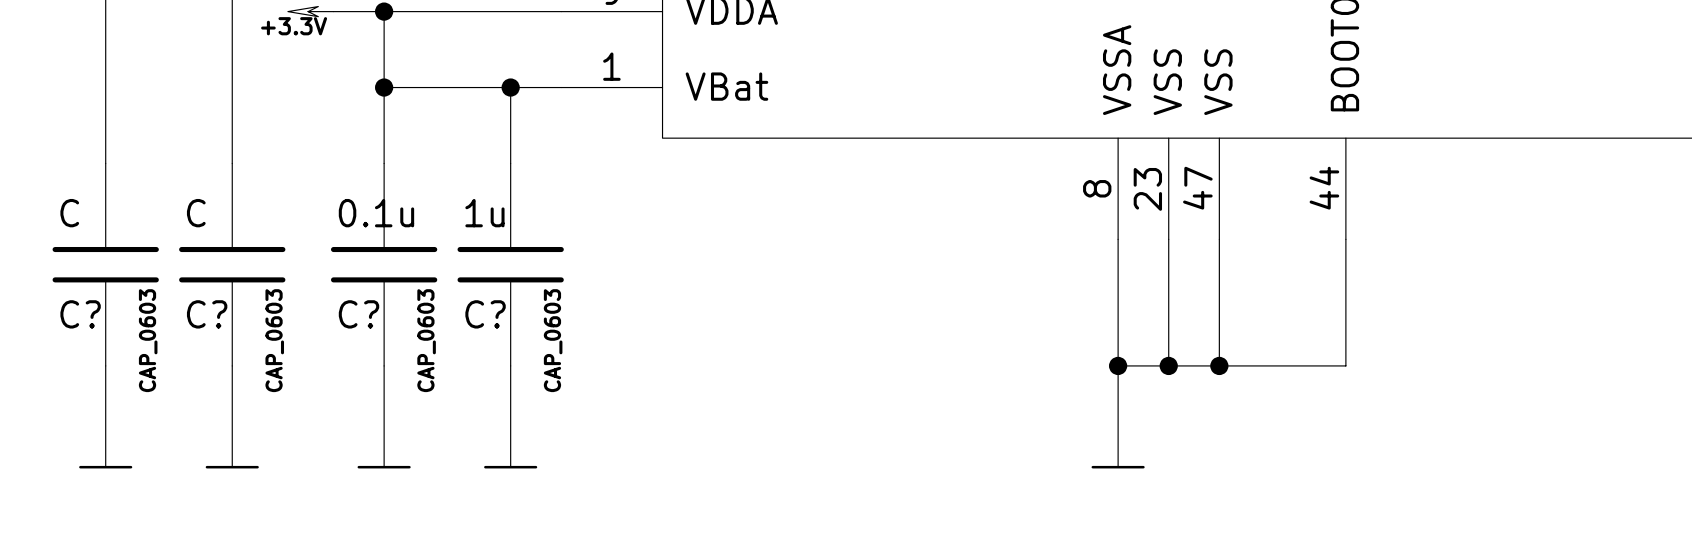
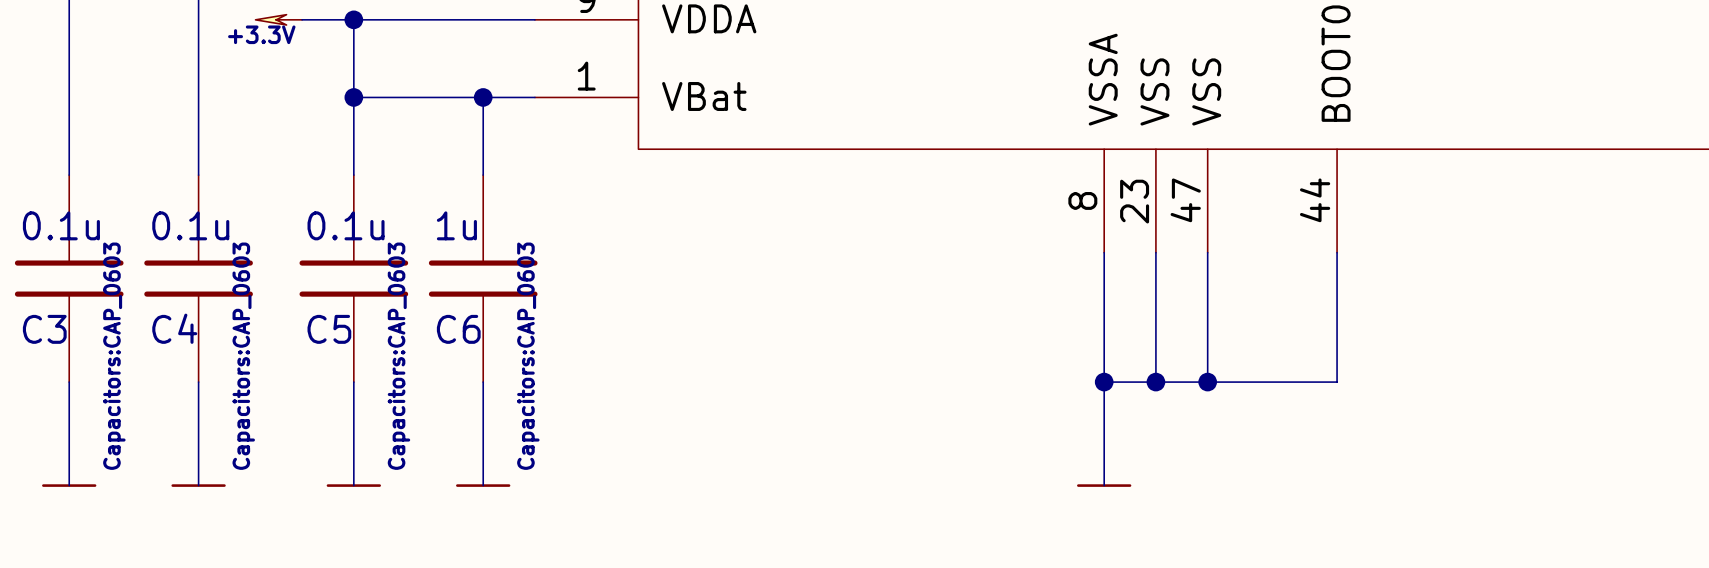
C? value: C (69, 213) -> 0.1u (61, 225)
C? value: C (196, 213) -> 0.1u (190, 225)
C? name: C? (80, 314) -> C3 (44, 329)
C? name: C? (207, 314) -> C4 (174, 328)
C? name: C? (359, 314) -> C5 (329, 329)
C? name: C? (485, 314) -> C6 (458, 329)
C? text: CAP_0603 (148, 340) -> Capacitors:CAP_0603 (114, 356)
C? text: CAP_0603 (274, 340) -> Capacitors:CAP_0603 (243, 356)
C? text: CAP_0603 (426, 340) -> Capacitors:CAP_0603 (398, 356)
C? text: CAP_0603 (553, 340) -> Capacitors:CAP_0603 (528, 356)

